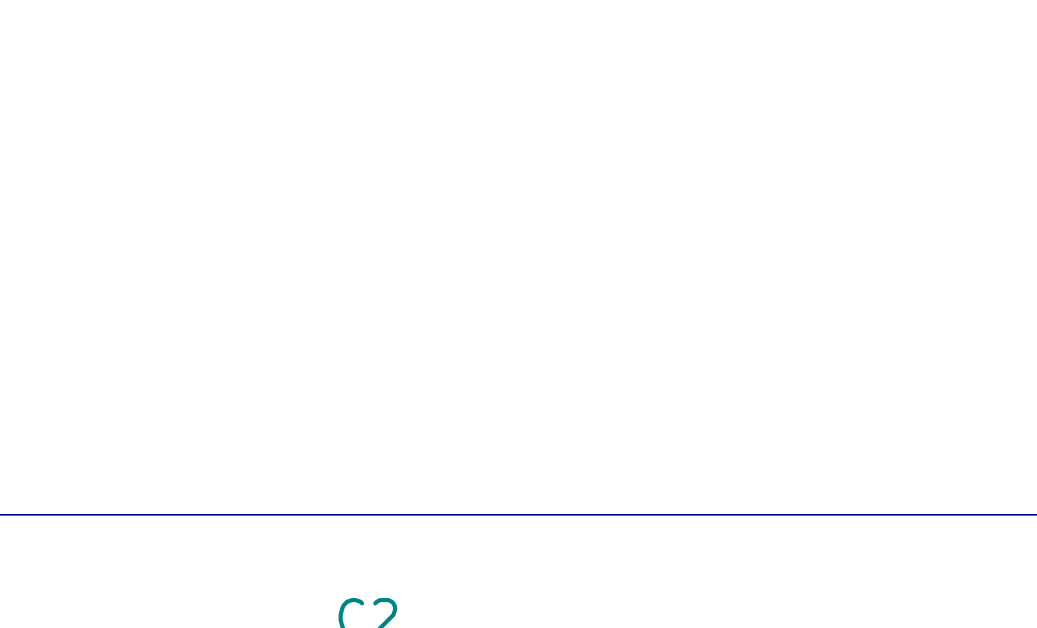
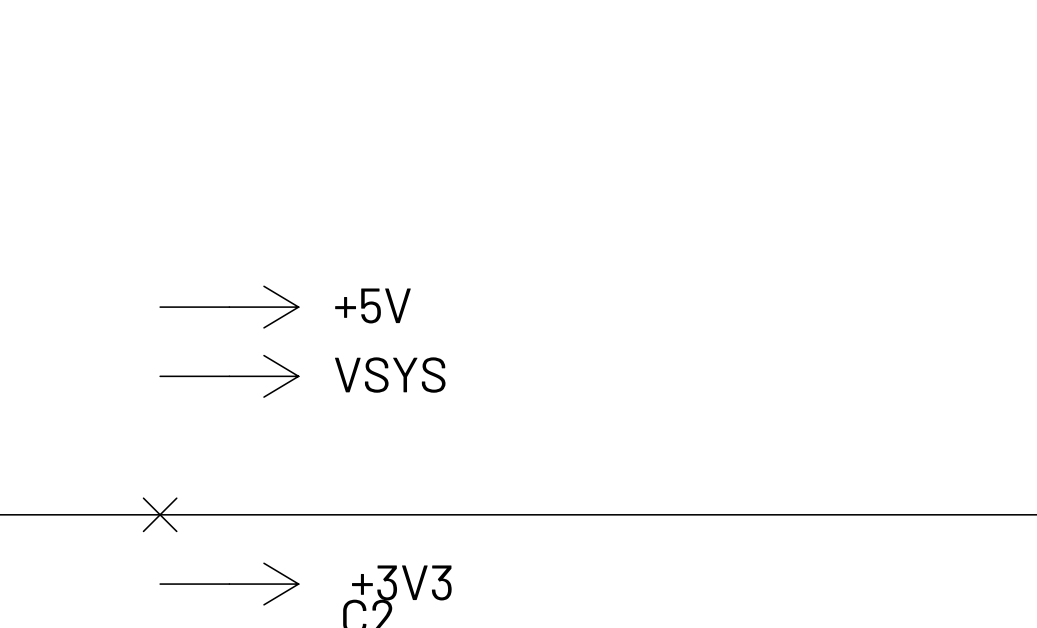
wire: none -> (160, 307) (229, 307)
power symbol: none -> +5V (263, 307)
wire: none -> (160, 376) (229, 376)
power symbol: none -> VSYS (263, 376)
no-connect mark: none -> (160, 514)
wire: none -> (160, 584) (229, 584)
power symbol: none -> +3V3 (263, 584)

